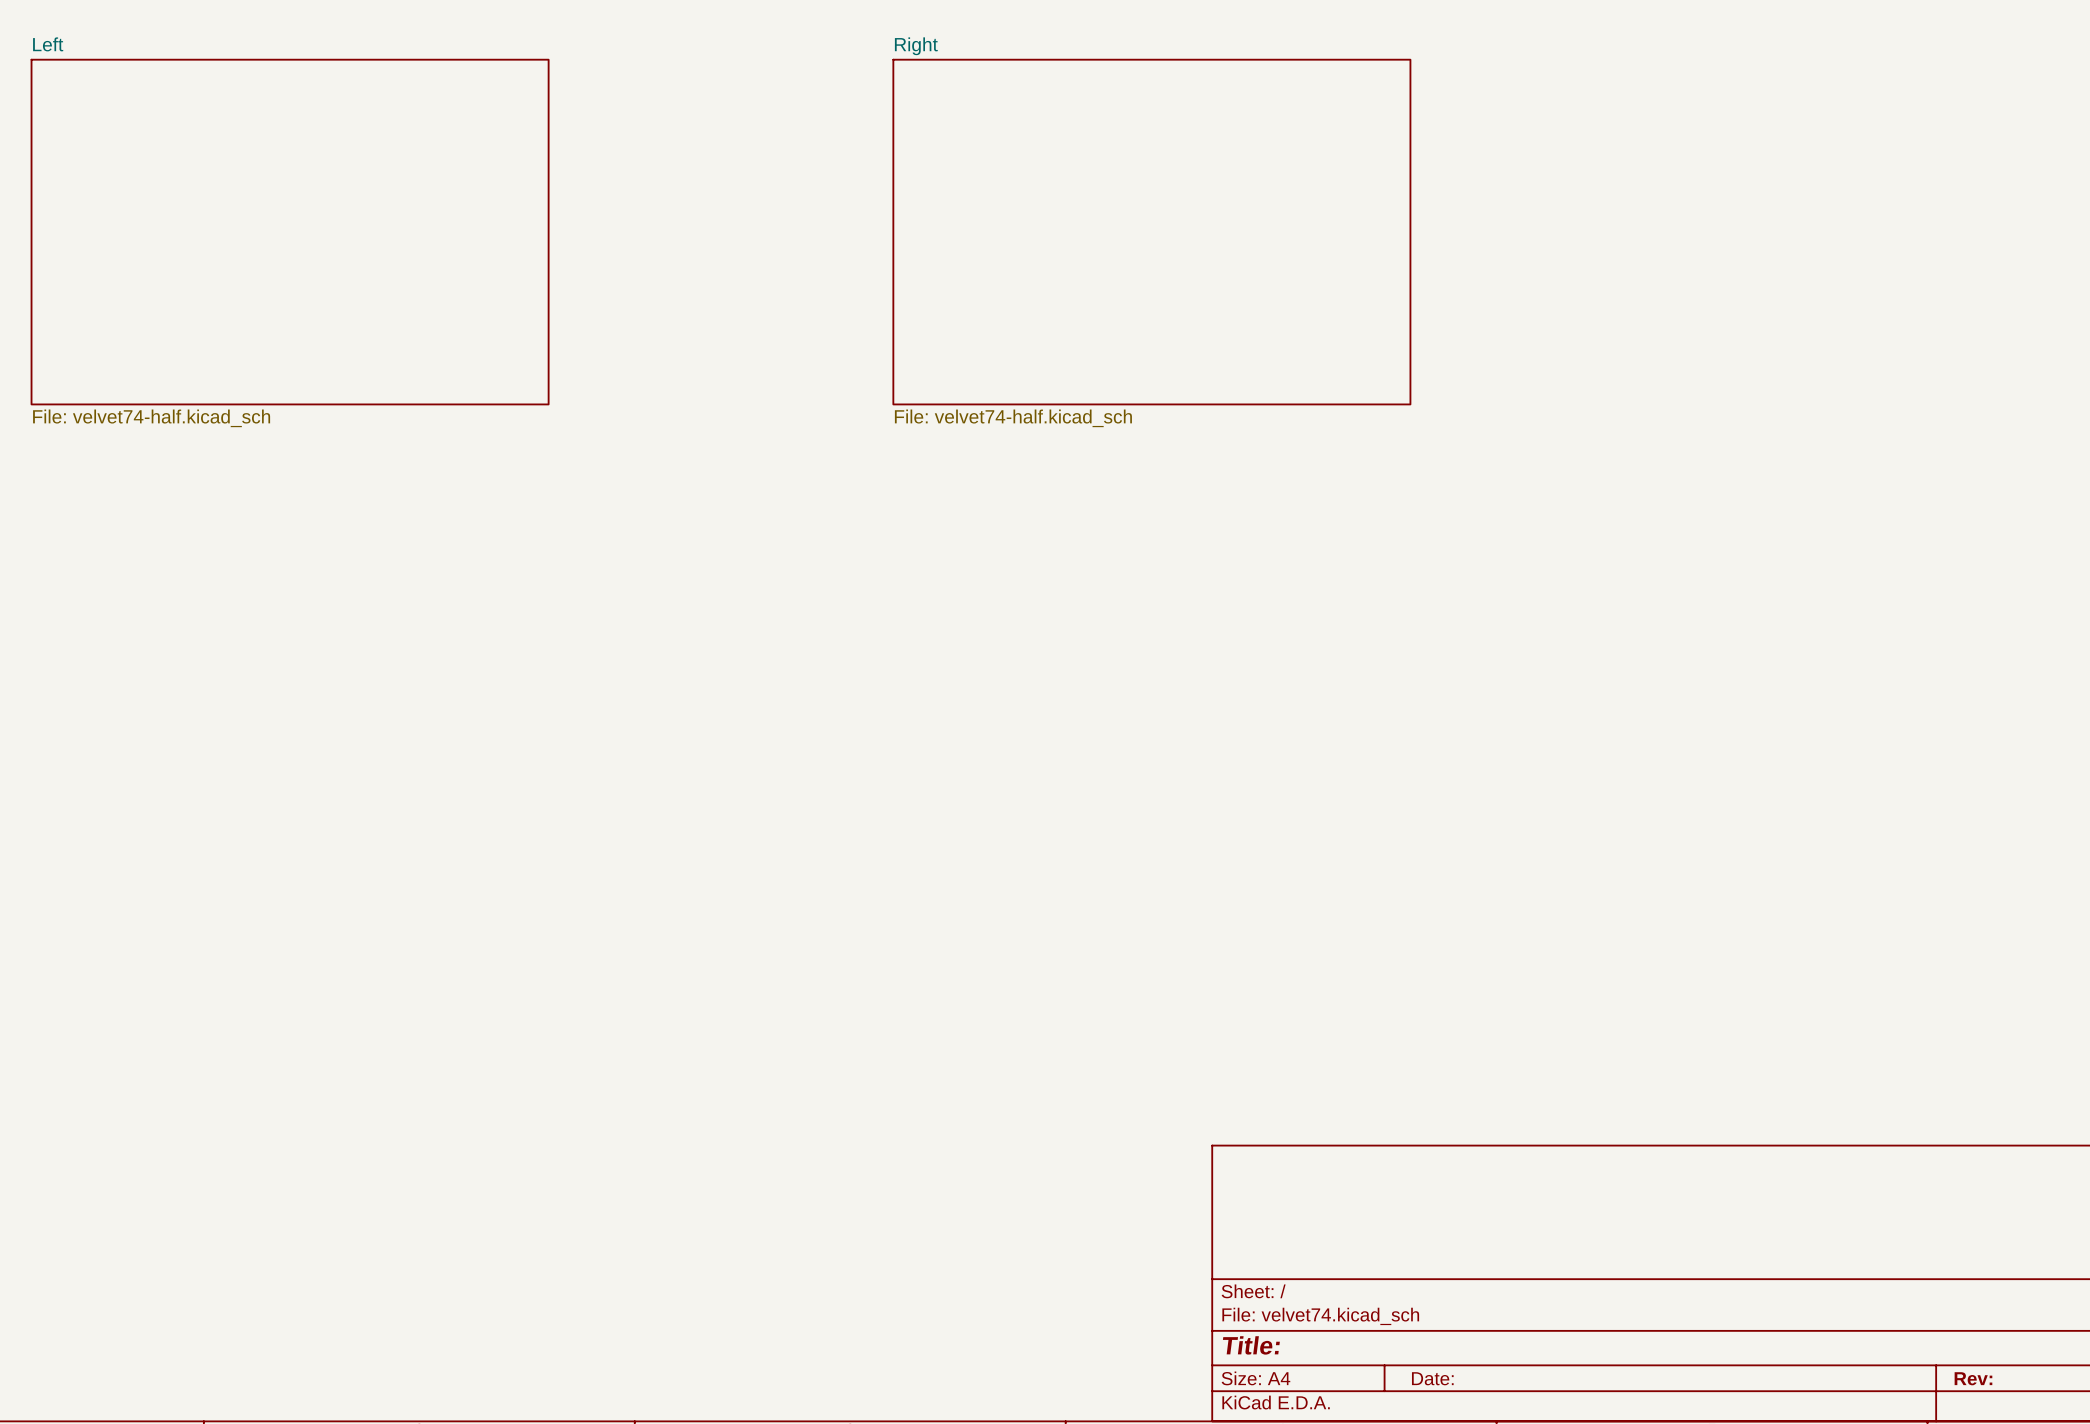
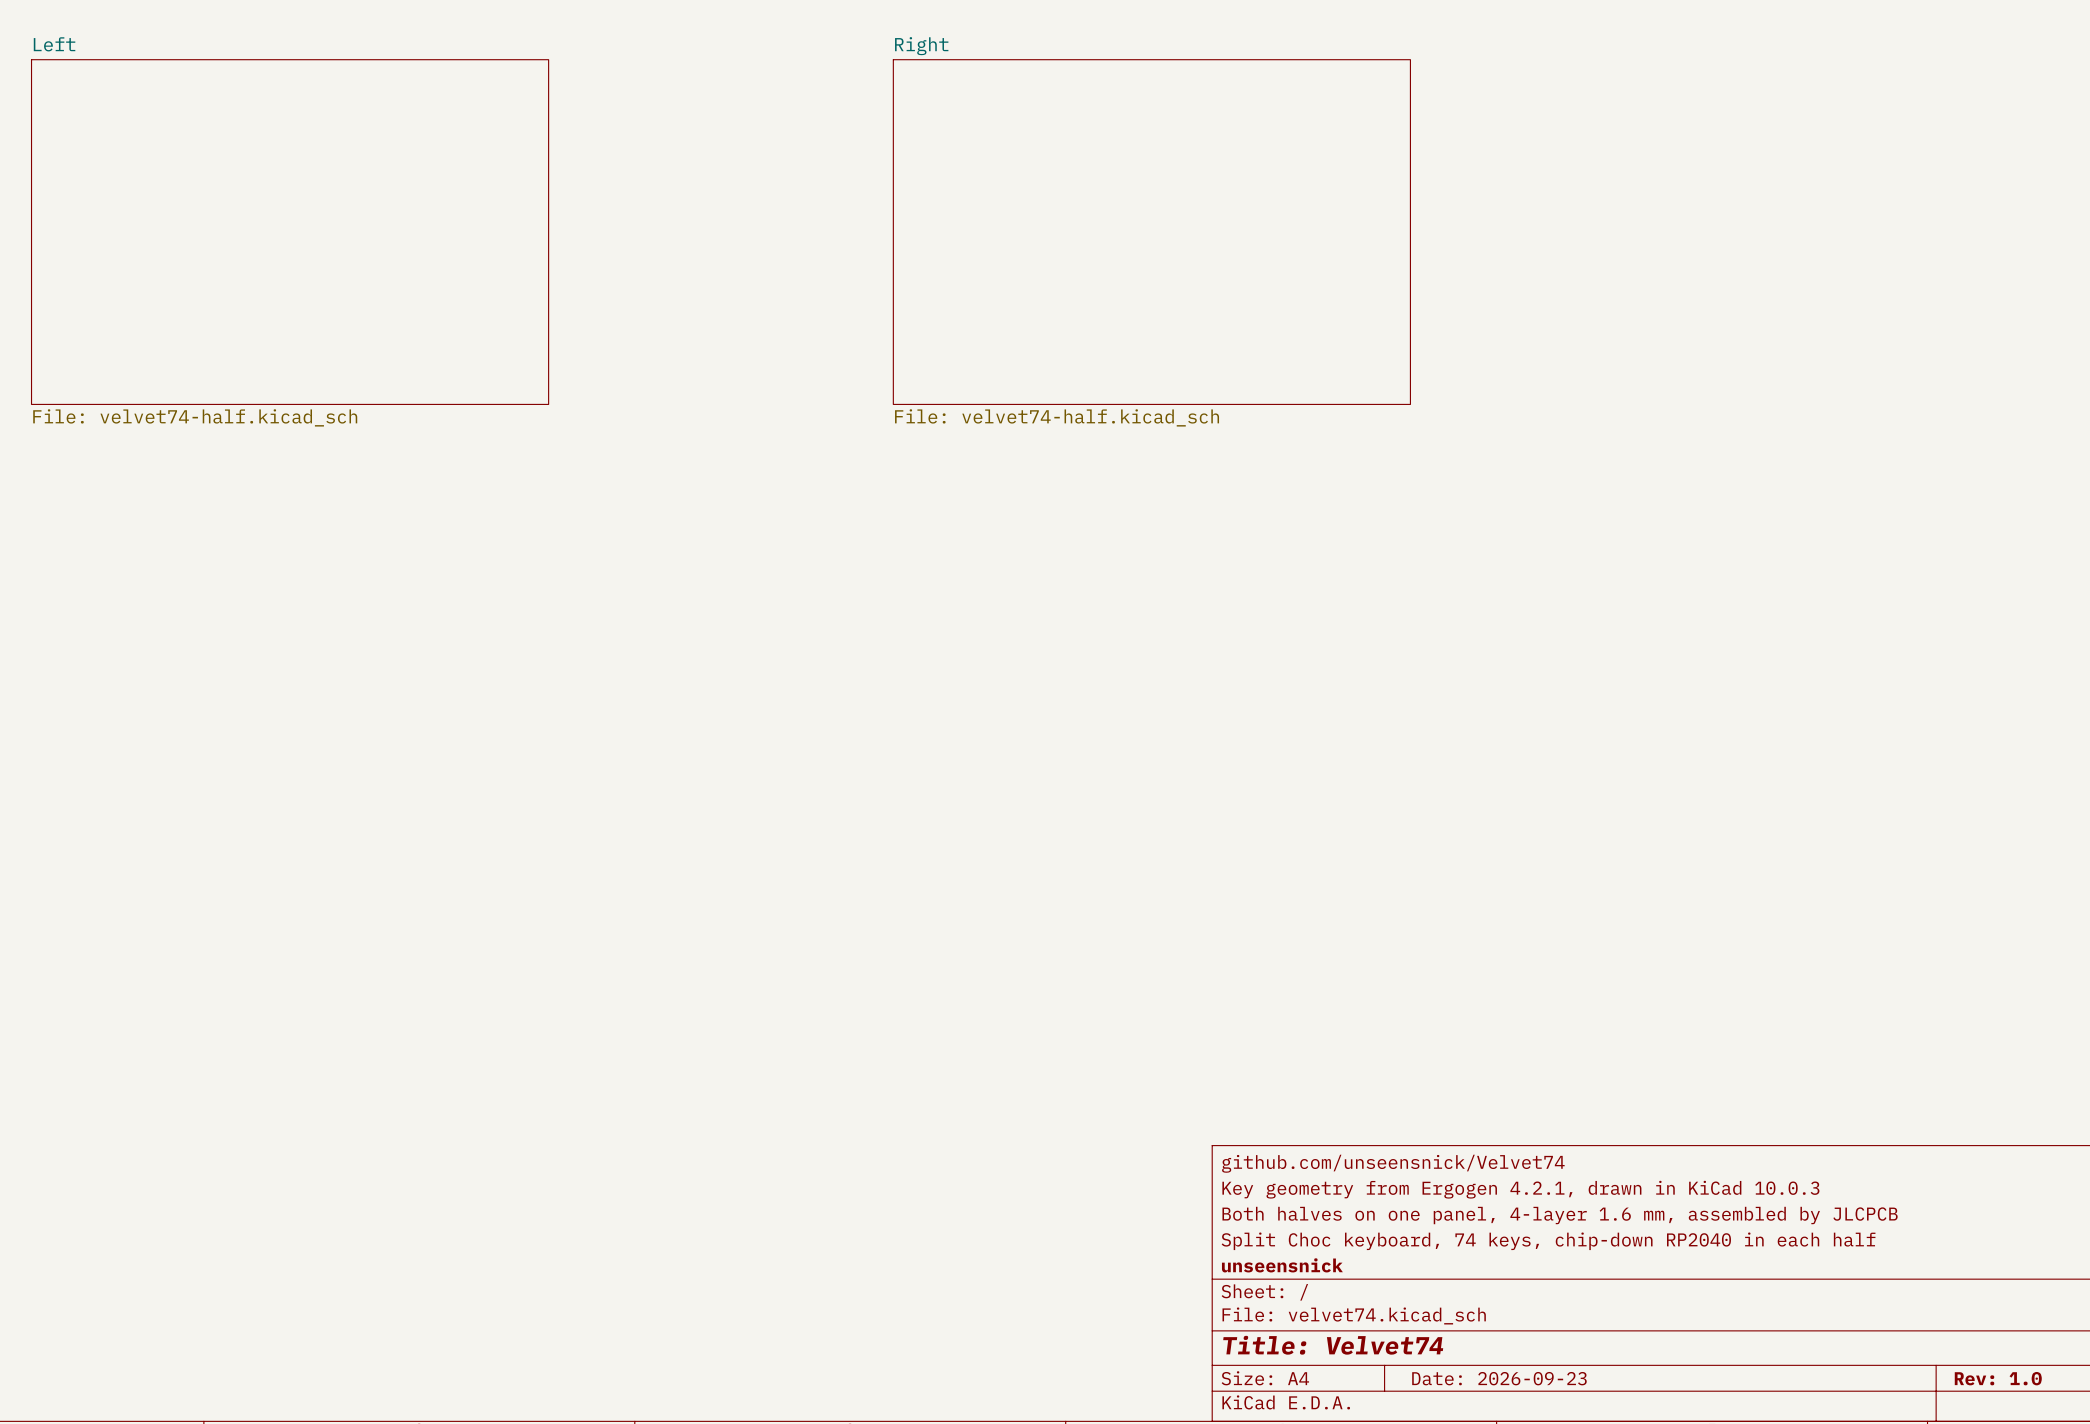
title block: none -> github.com/unseensnick/Velvet74 (1393, 1163)
title block: none -> Key geometry from Ergogen 4.2.1, drawn in KiCad 10.0.3 (1520, 1189)
title block: none -> Both halves on one panel, 4-layer 1.6 mm, assembled by JLCPCB (1560, 1215)
title block: none -> Split Choc keyboard, 74 keys, chip-down RP2040 in each half (1548, 1241)
title block: none -> unseensnick (1282, 1265)
title block: Title: (1251, 1345) -> Title: Velvet74 (1333, 1345)
title block: Date: (1432, 1378) -> Date: 2026-09-23 (1499, 1378)
title block: Rev: (1973, 1378) -> Rev: 1.0 (1998, 1378)

